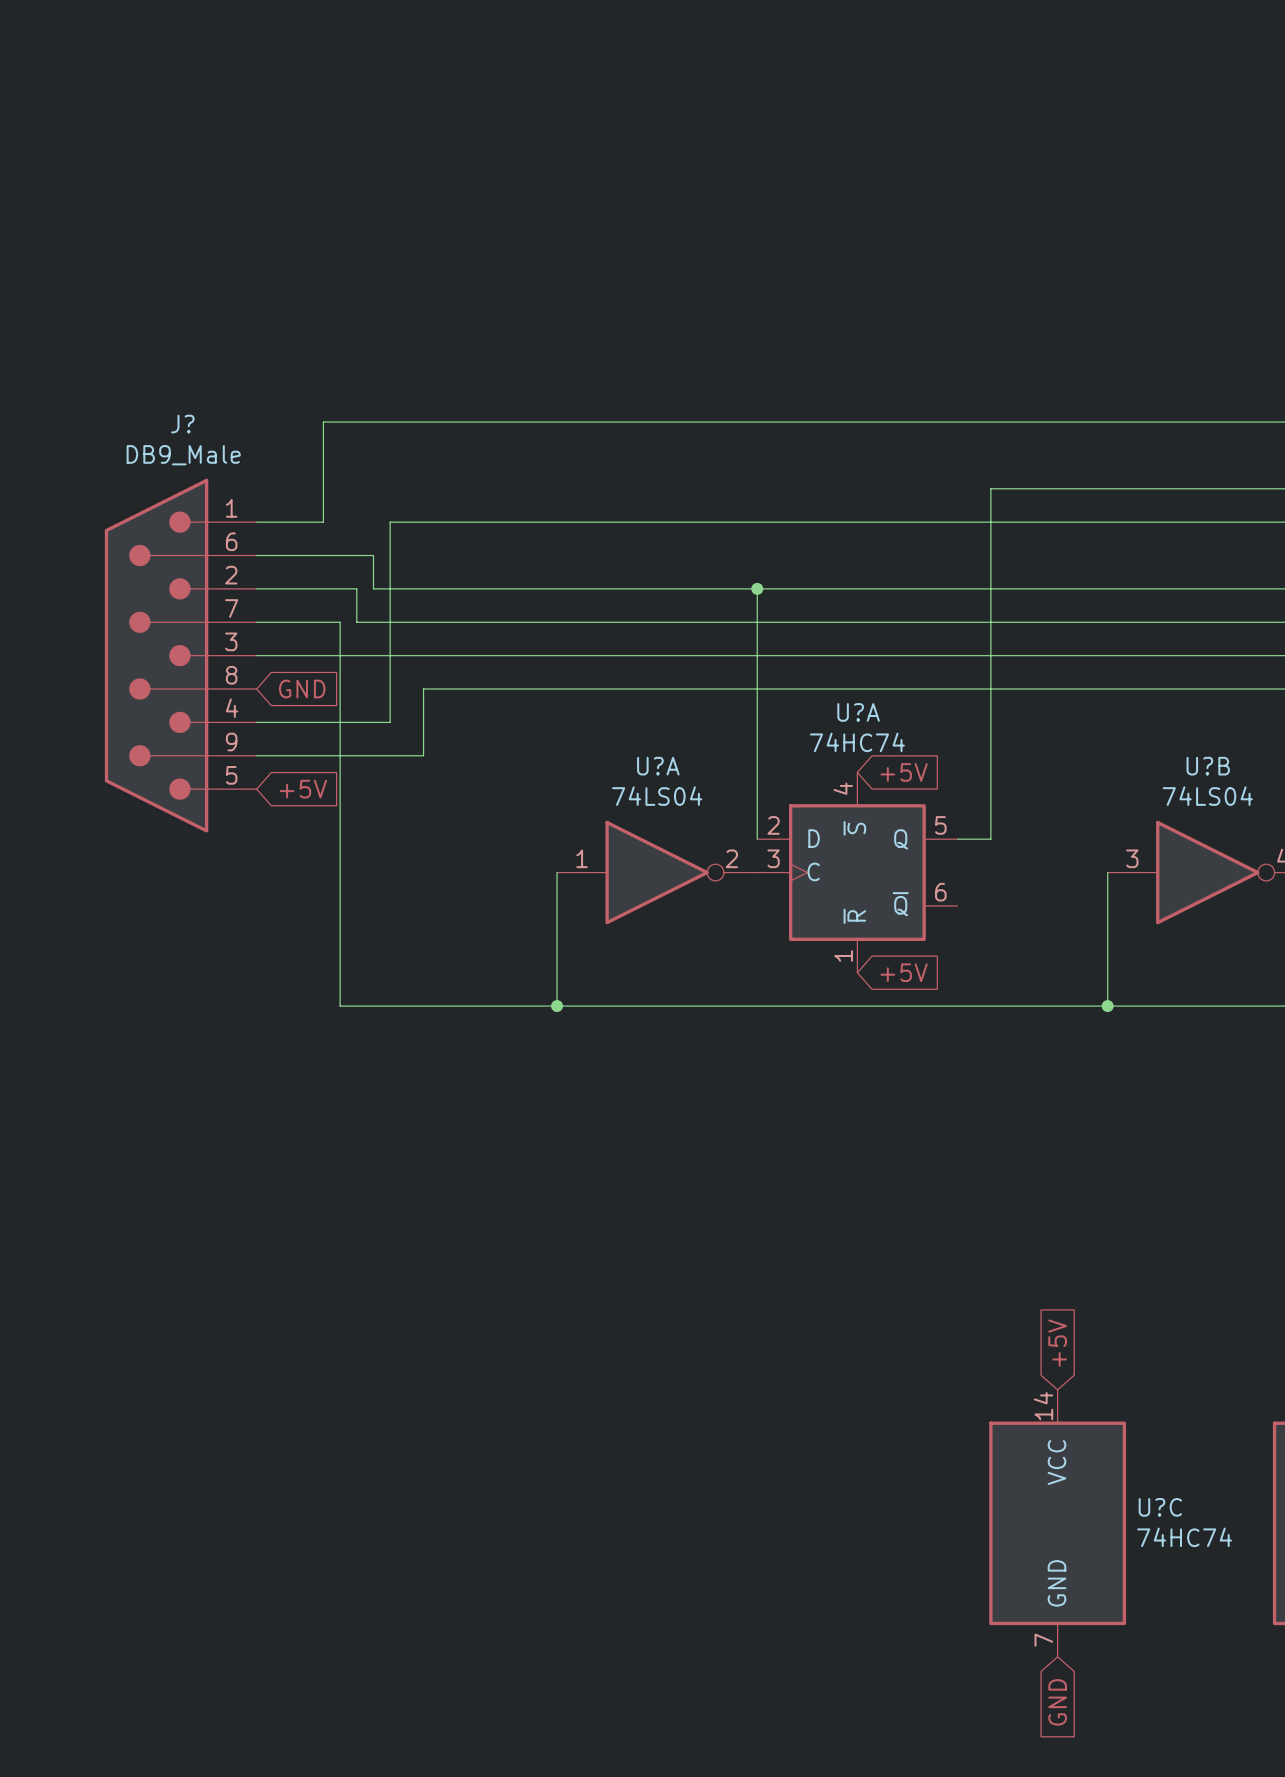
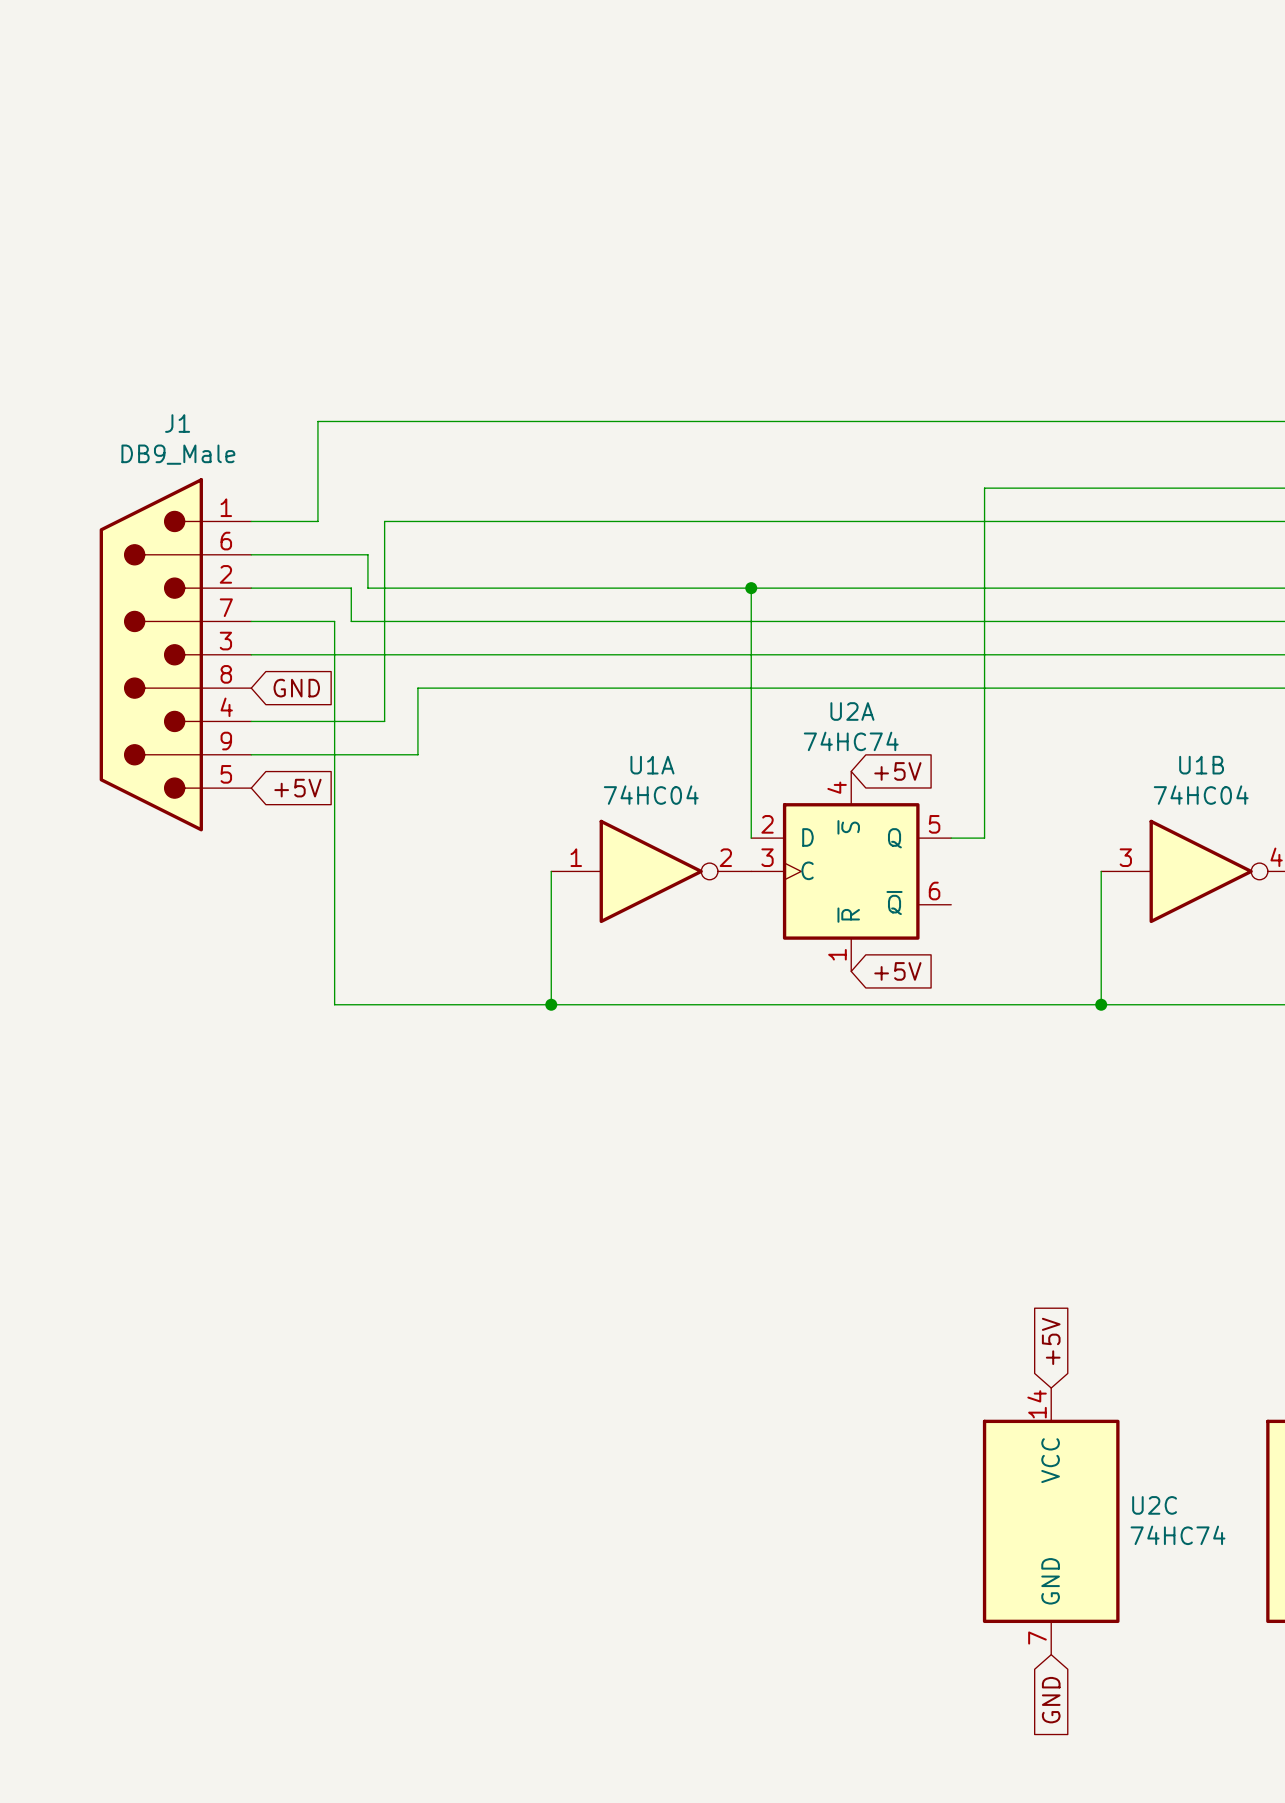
J? name: J? (182, 424) -> J1 (177, 423)
U?A name: U?A (858, 712) -> U2A (852, 711)
U?A name: U?A (658, 766) -> U1A (652, 765)
U?B name: U?B (1208, 766) -> U1B (1201, 765)
U?A value: 74LS04 (657, 796) -> 74HC04 (651, 795)
U?B value: 74LS04 (1207, 796) -> 74HC04 (1201, 795)
U?C name: U?C (1160, 1507) -> U2C (1154, 1505)

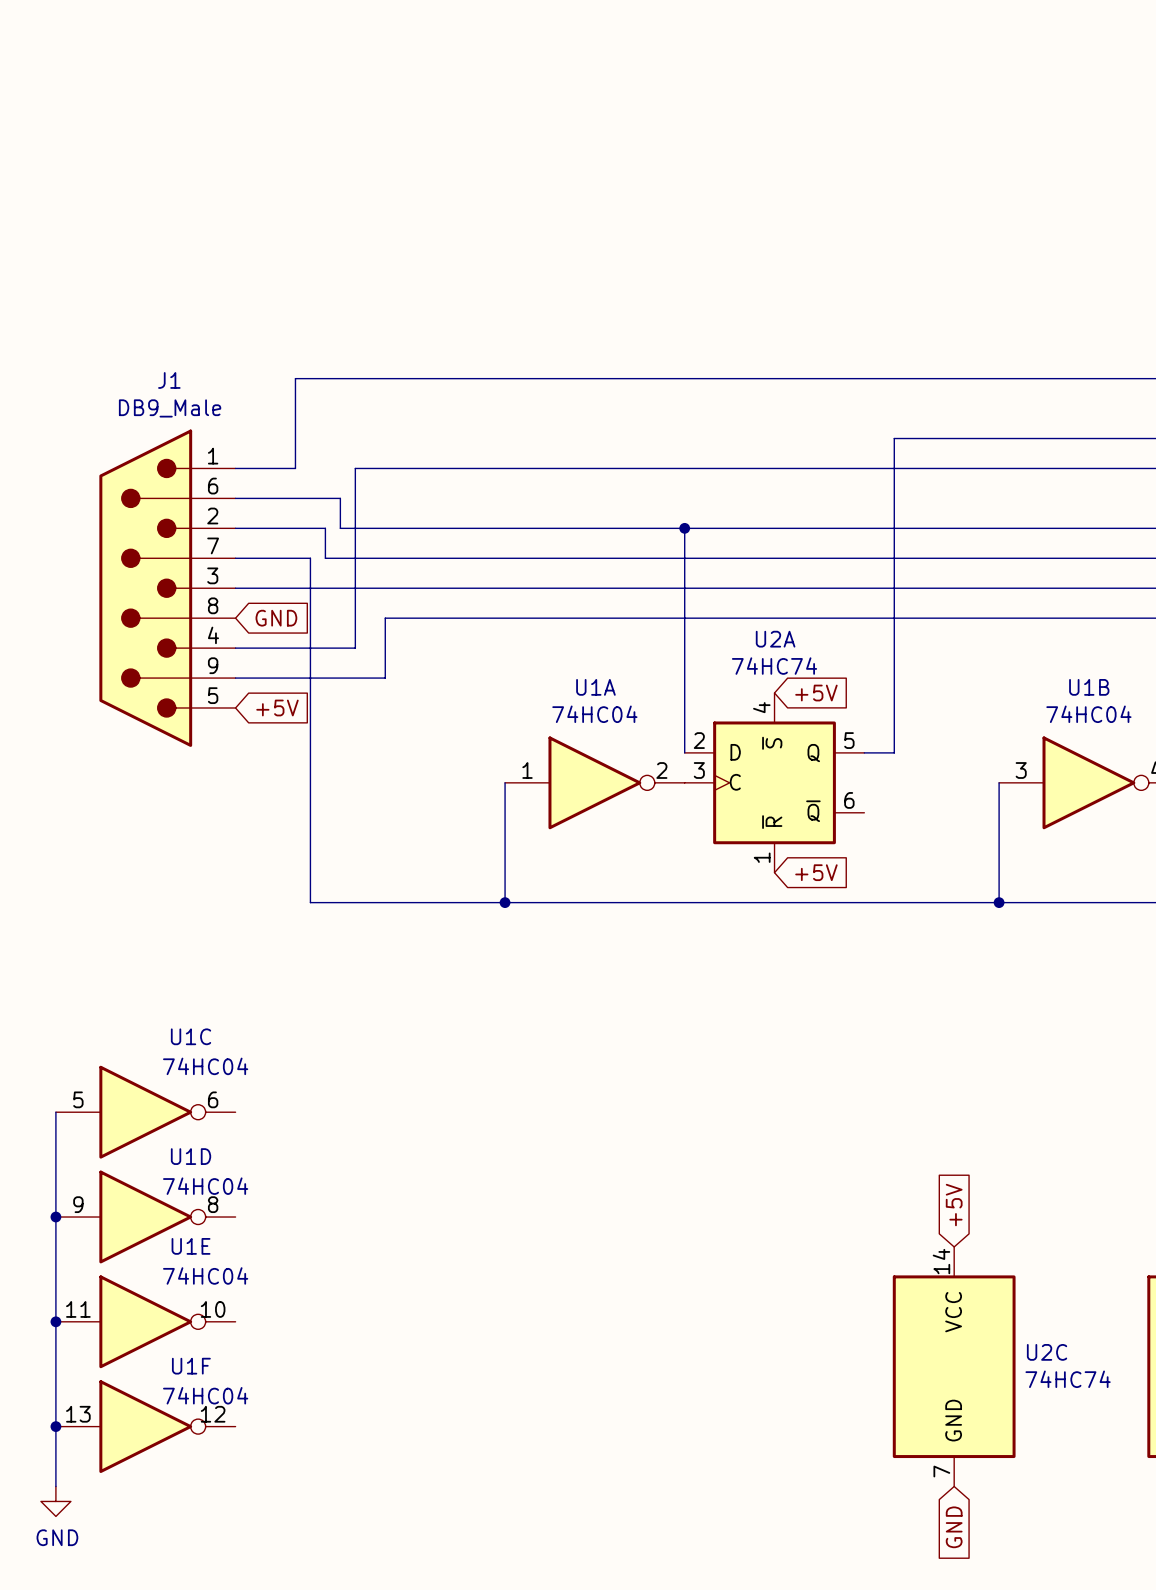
wire: none -> (55, 1112) (55, 1486)
U1C: none -> 74HC04 (145, 1112)
junction: none -> (55, 1217)
U1D: none -> 74HC04 (145, 1217)
junction: none -> (55, 1321)
U1E: none -> 74HC04 (145, 1321)
junction: none -> (55, 1426)
U1F: none -> 74HC04 (145, 1426)
power symbol: none -> GND (55, 1501)

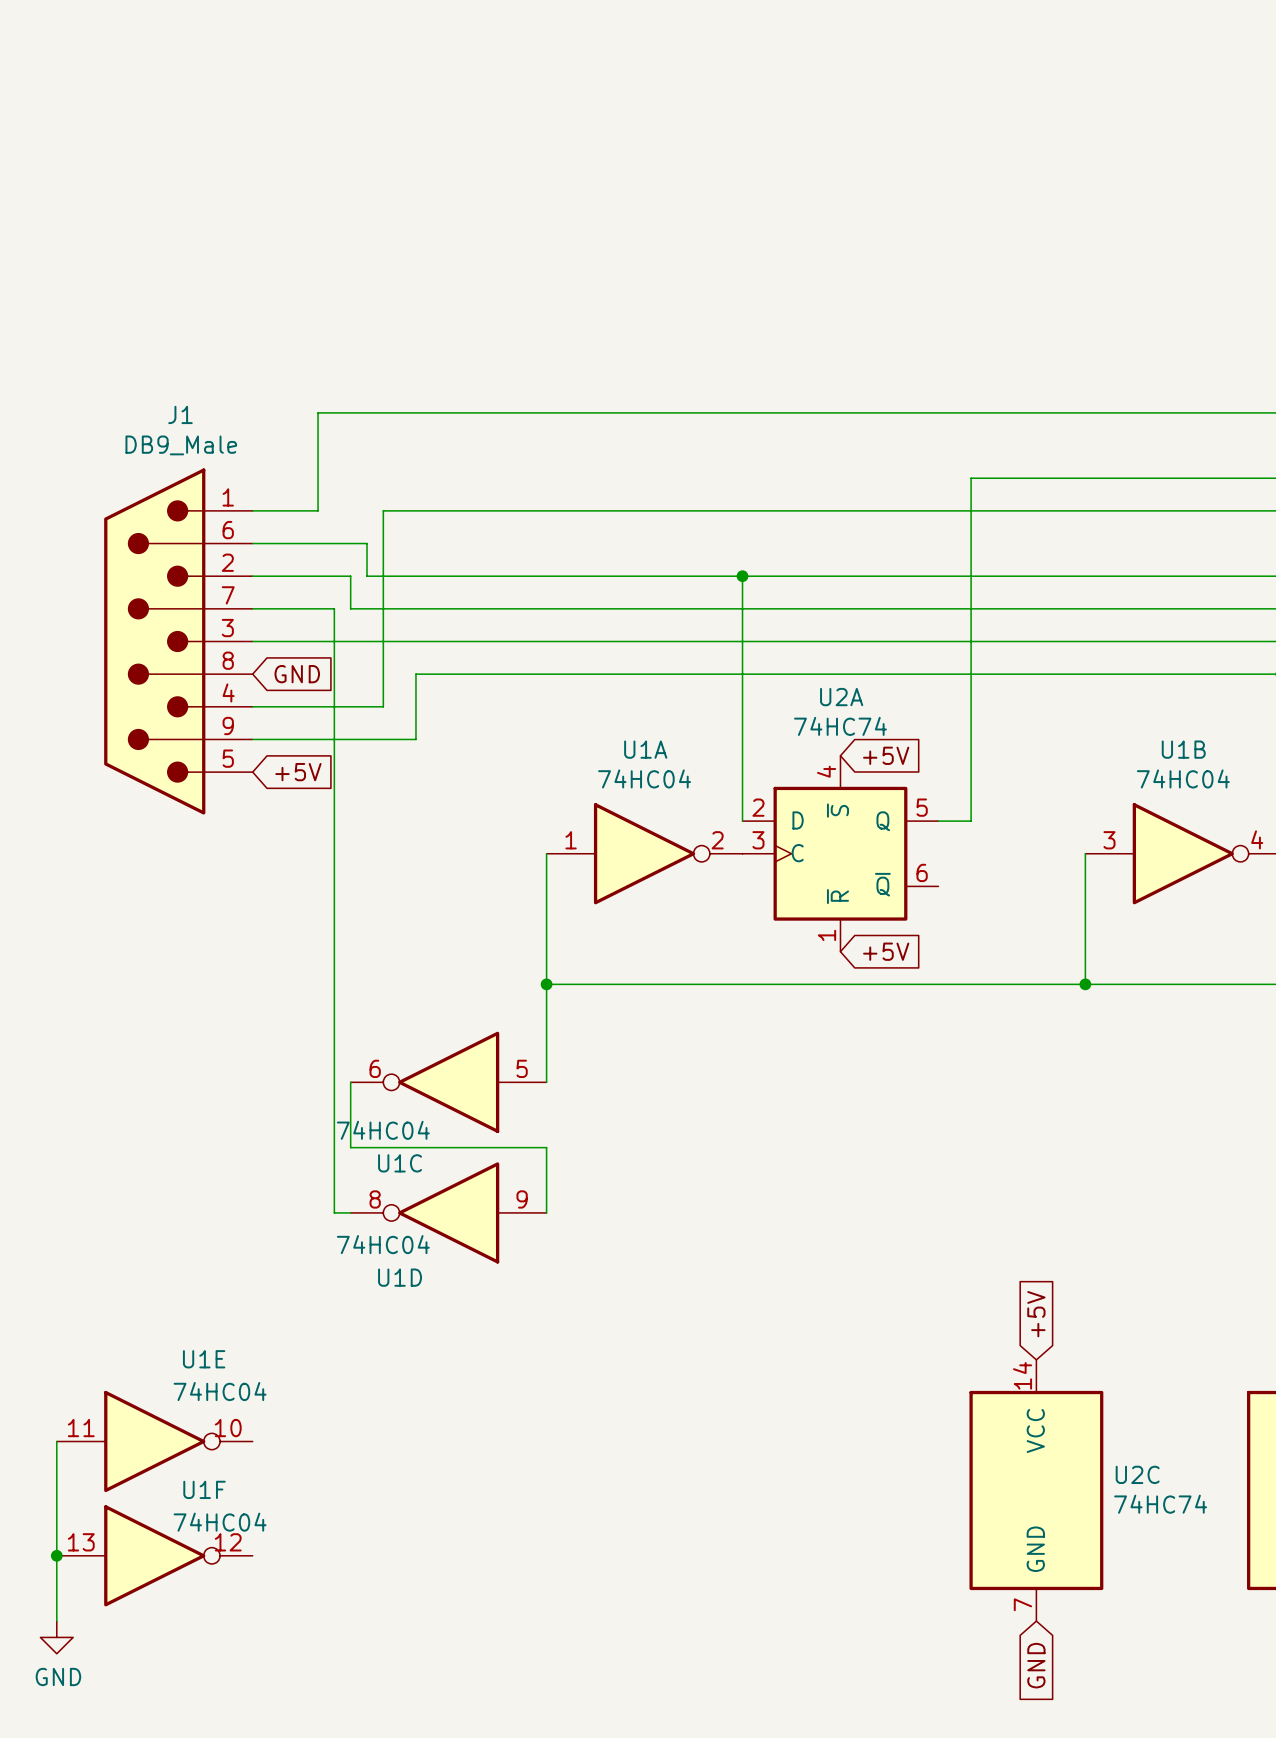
wire: (310, 902) (505, 902) -> (546, 1082) (546, 984)
wire: none -> (334, 984) (334, 1212) (350, 1212)
wire: none -> (350, 1082) (350, 1147) (546, 1147) (546, 1212)
wire: (55, 1112) (55, 1321) -> none
U1C rotation: 0° (145, 1112) -> 180° (448, 1082)
U1C position: (145, 1112) -> (448, 1082)
junction: (55, 1217) -> none
U1D rotation: 0° (145, 1217) -> 180° (448, 1212)
U1D position: (145, 1217) -> (448, 1212)
junction: (55, 1321) -> none

